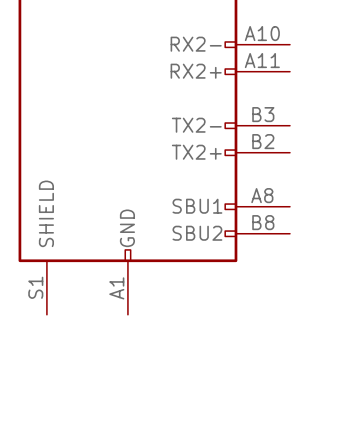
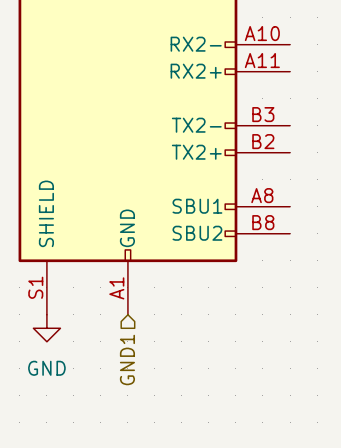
power symbol: none -> GND (46, 328)
hierarchical label: none -> GND1 (127, 360)

